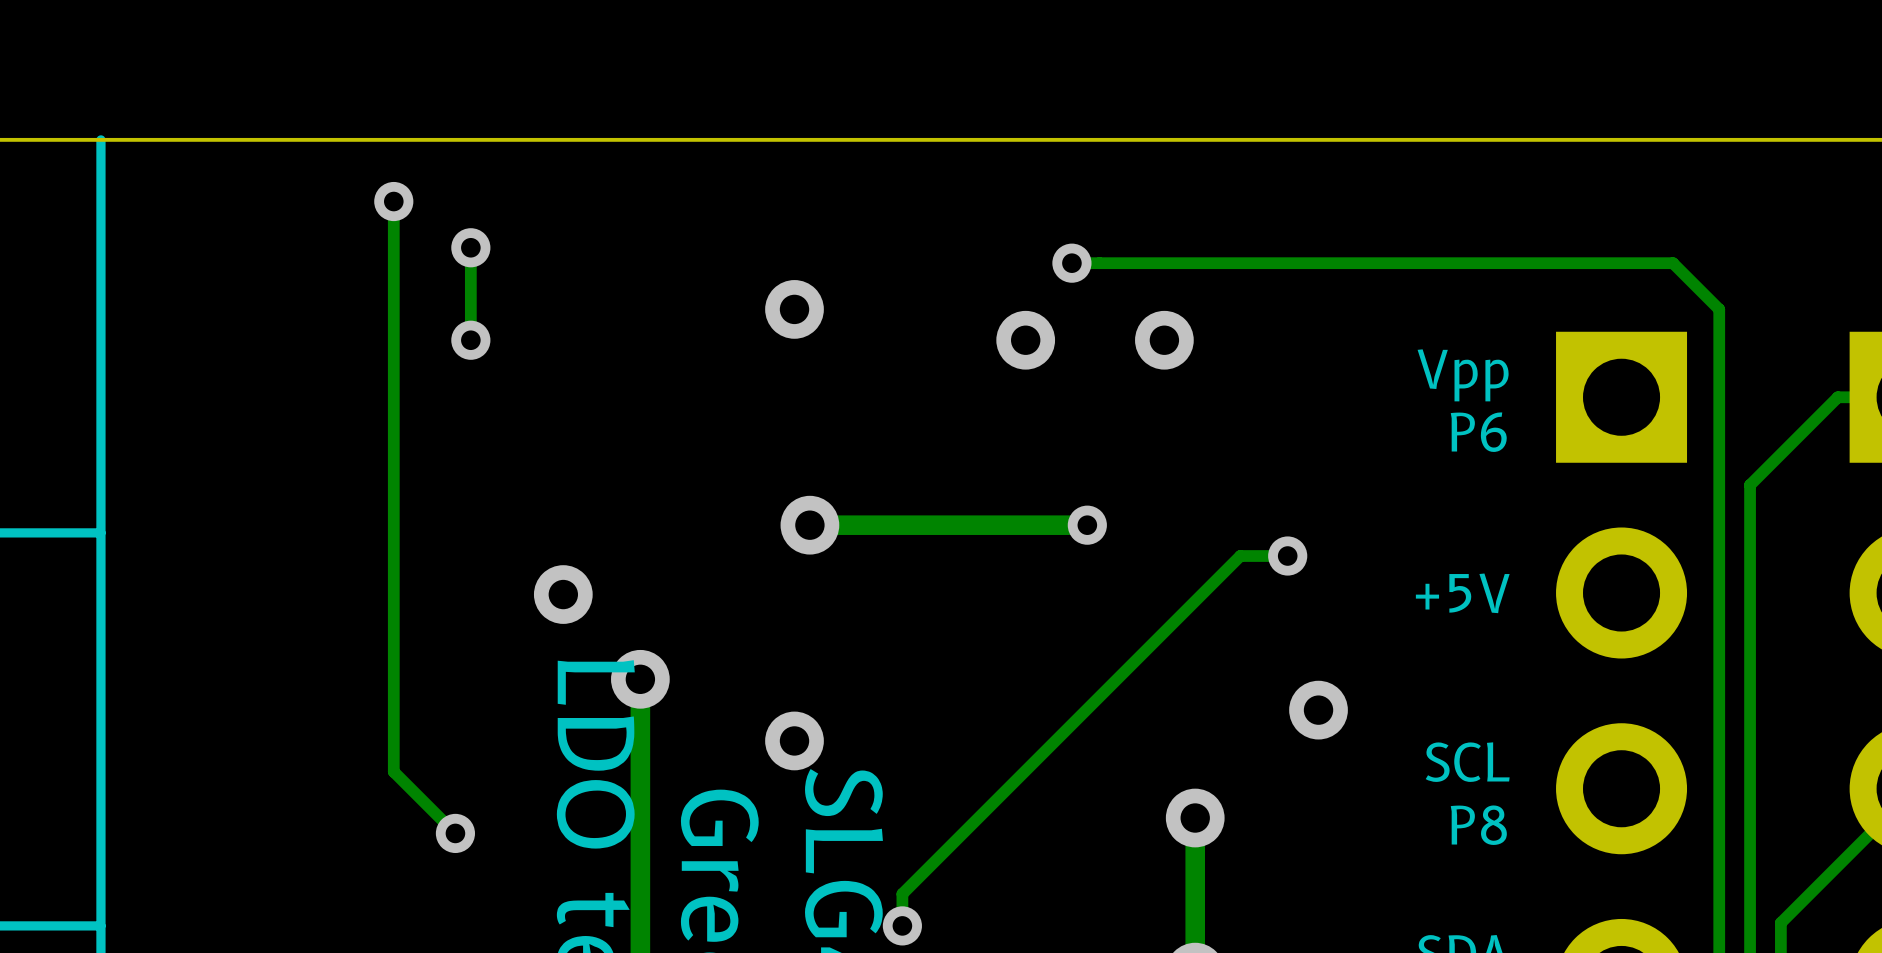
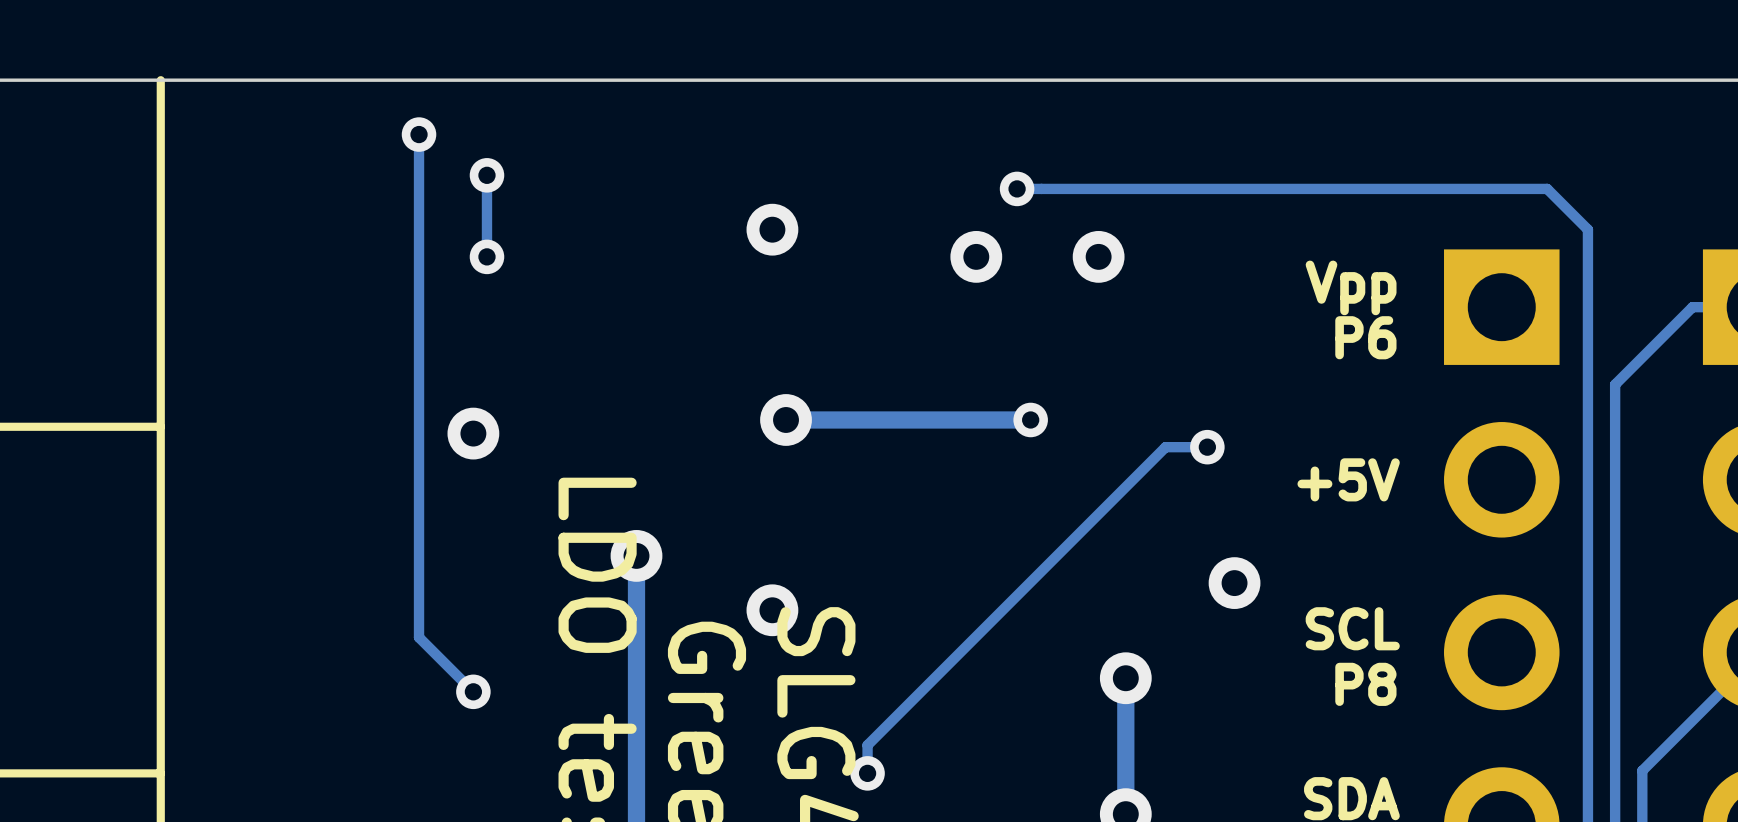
via position: (563, 594) -> (473, 433)

